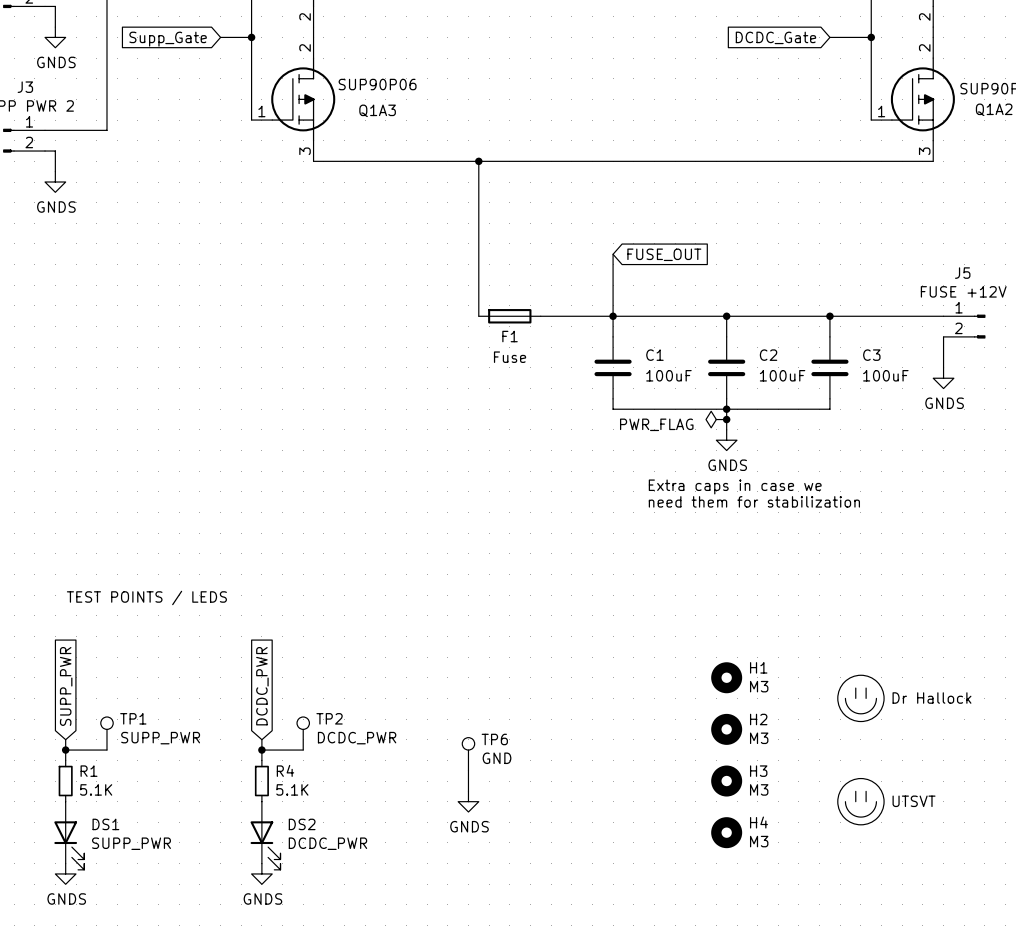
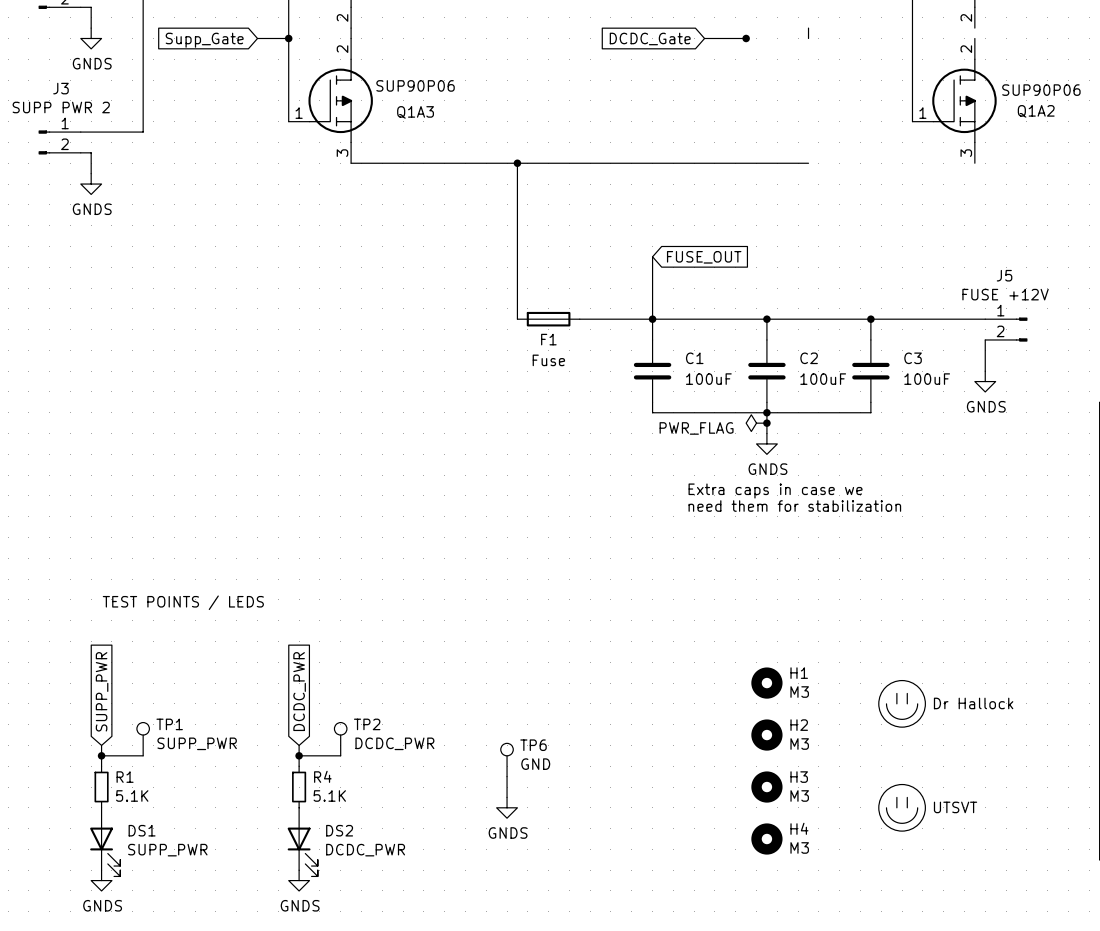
wire: (933, 27) (933, 37) -> (808, 28) (808, 38)
junction: none -> (746, 38)
global label position: DCDC_Gate (775, 37) -> DCDC_Gate (650, 38)
wire: (829, 37) (871, 37) -> (704, 38) (746, 38)
junction: (871, 37) -> none
wire: (767, 161) (933, 161) -> none

